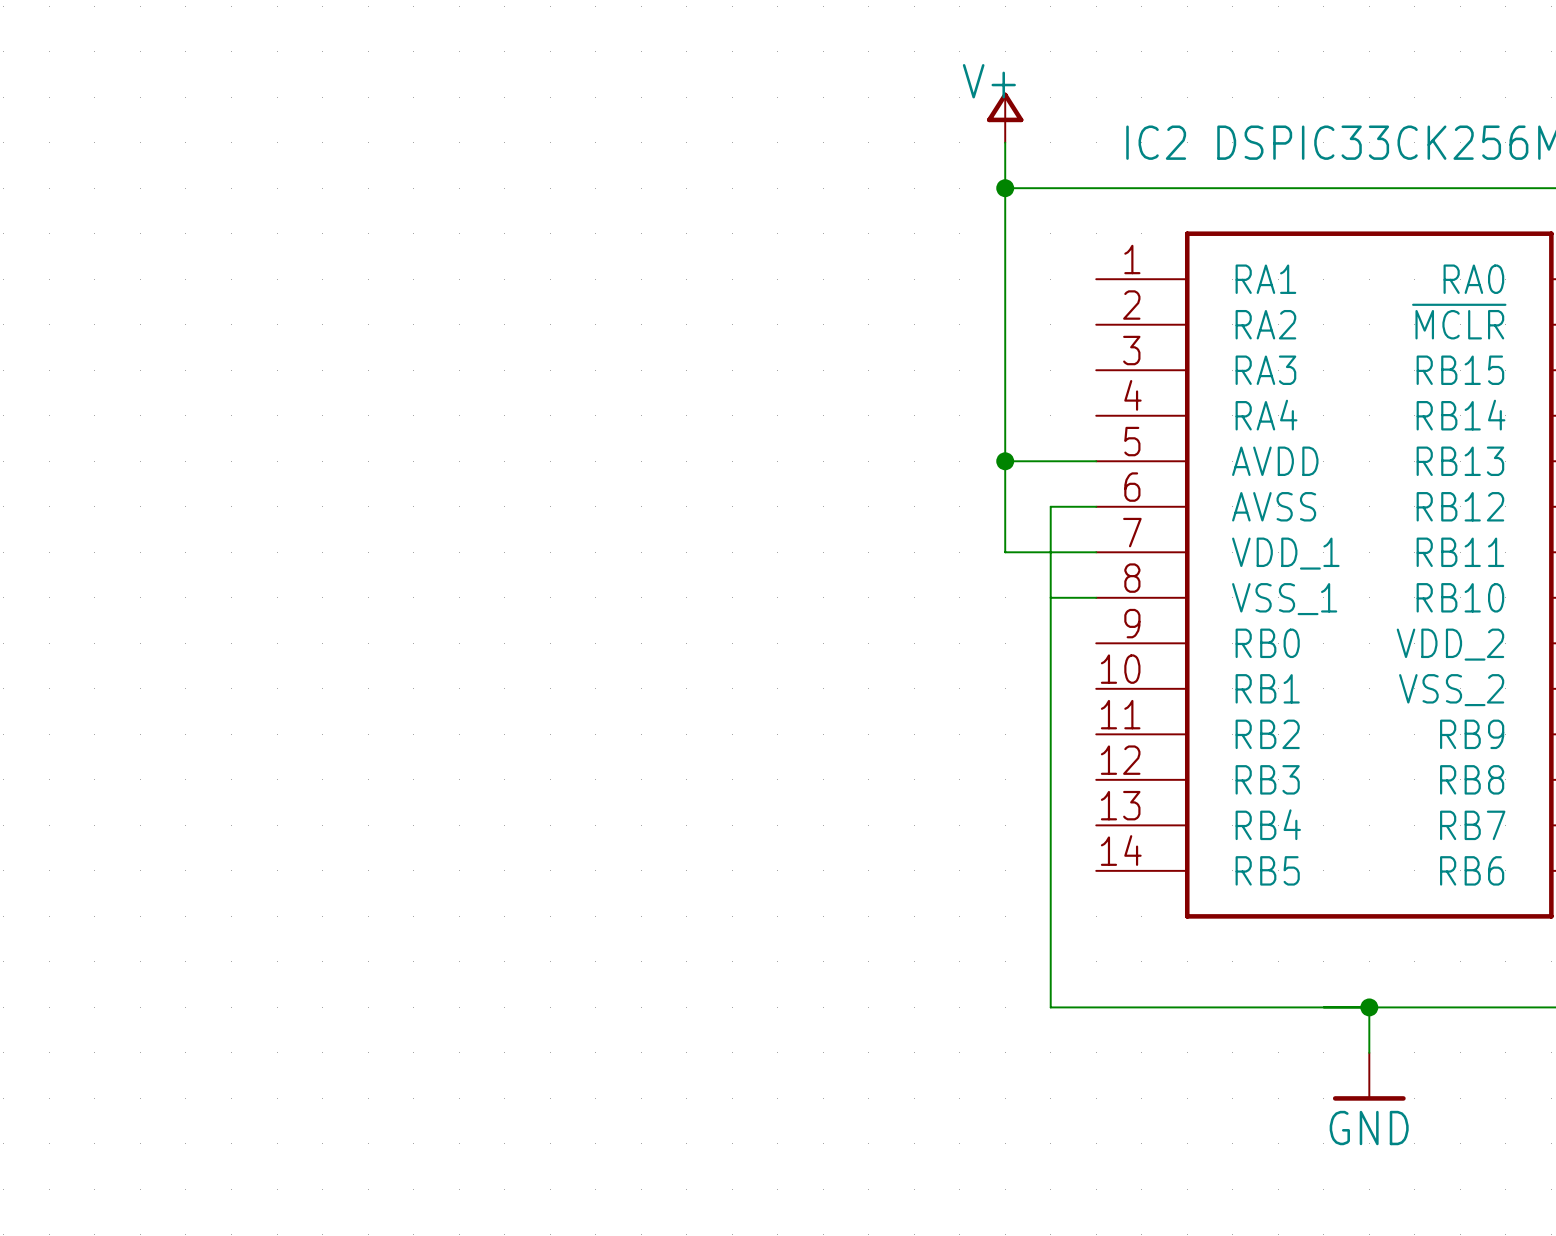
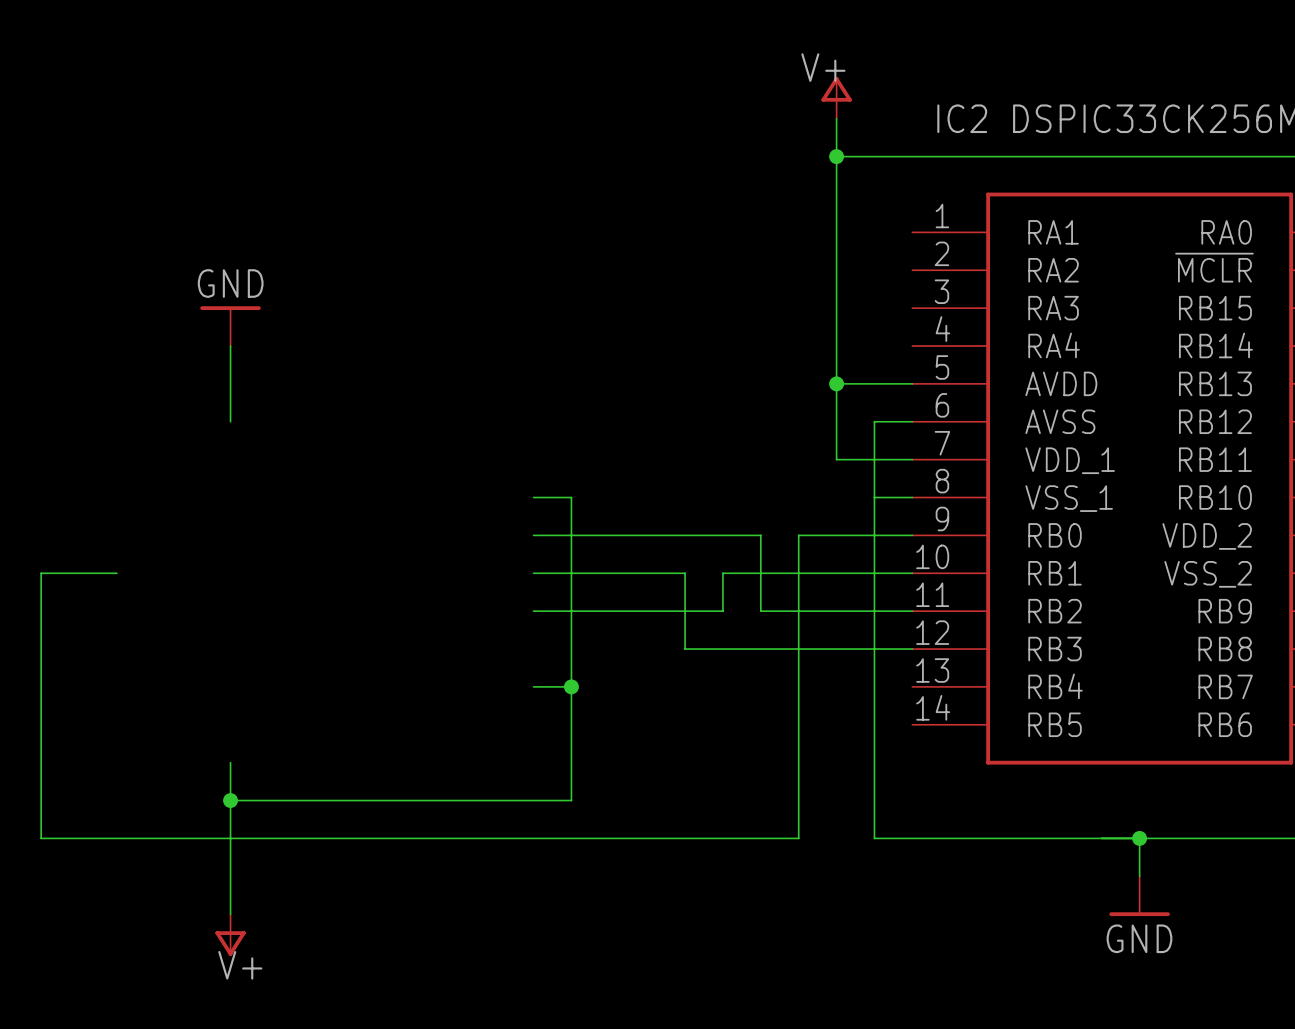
power symbol: none -> GND (230, 326)
wire: none -> (230, 346) (230, 421)
wire: none -> (533, 497) (571, 497) (571, 800) (230, 800)
wire: none -> (533, 535) (760, 535) (760, 611) (912, 611)
wire: none -> (912, 535) (798, 535) (798, 838) (41, 838) (41, 573) (116, 573)
wire: none -> (533, 573) (685, 573) (685, 649) (912, 649)
wire: none -> (912, 573) (722, 573) (722, 611) (533, 611)
wire: none -> (533, 686) (571, 686)
junction: none -> (571, 686)
wire: none -> (230, 762) (230, 914)
junction: none -> (230, 800)
power symbol: none -> V+ (230, 935)

